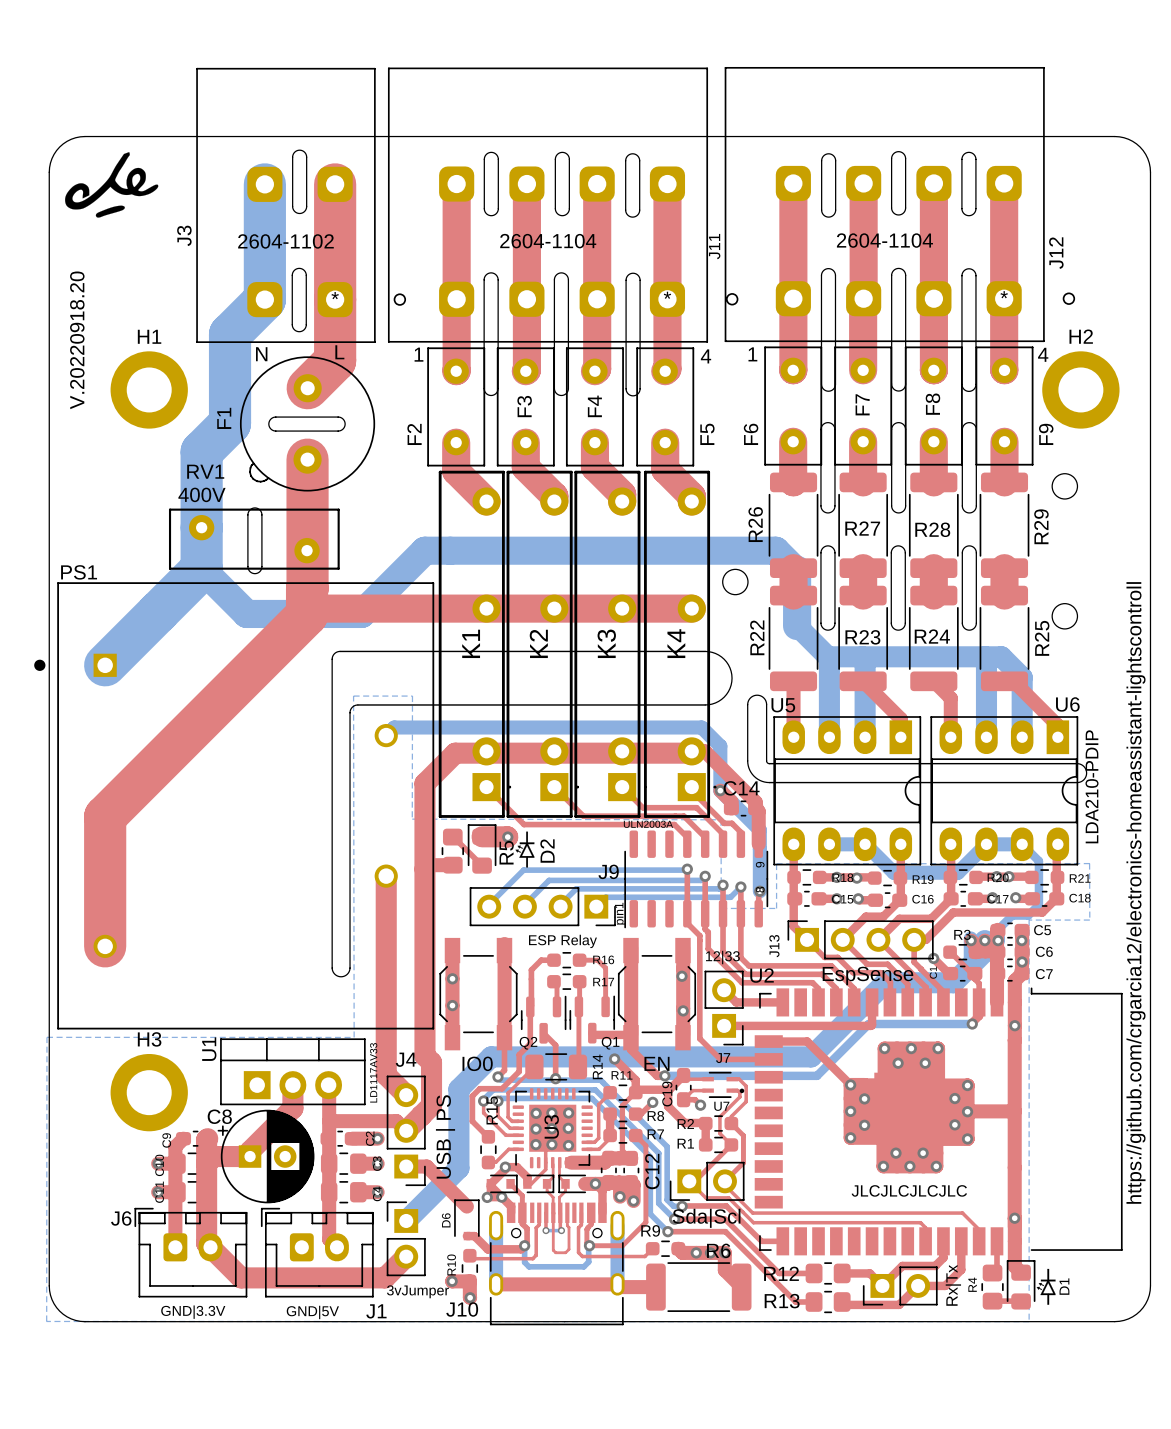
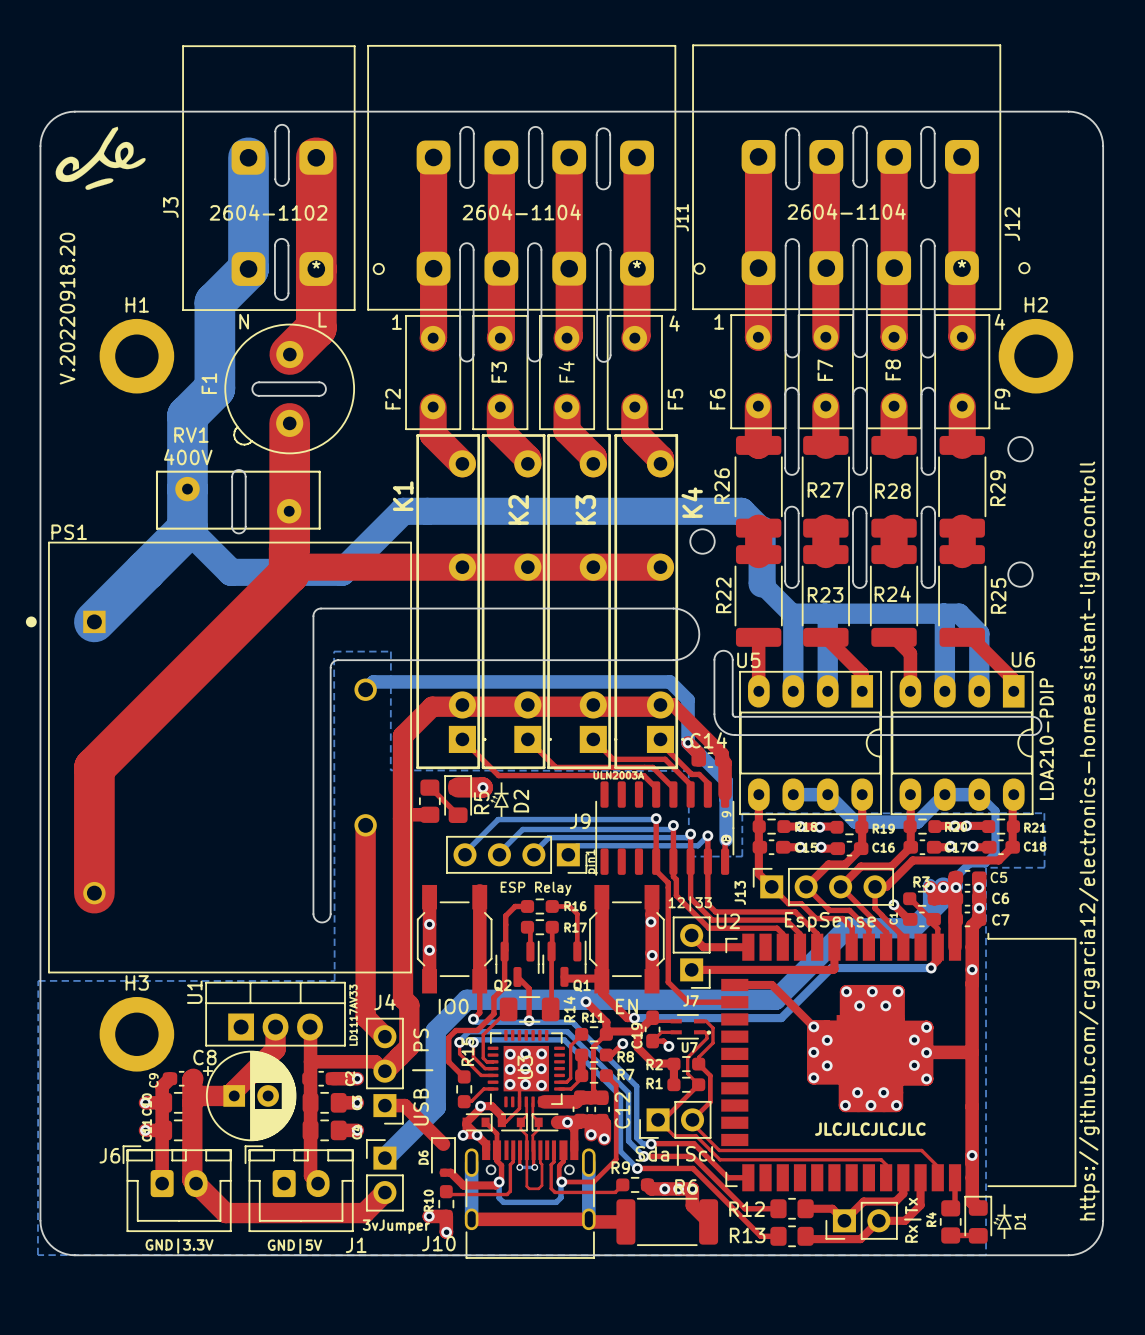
K1 name position: K1 (471, 643) -> K1 (403, 496)
K2 name position: K2 (538, 643) -> K2 (518, 509)
K3 name position: K3 (606, 643) -> K3 (585, 509)
K4 name position: K4 (676, 643) -> K4 (692, 502)

